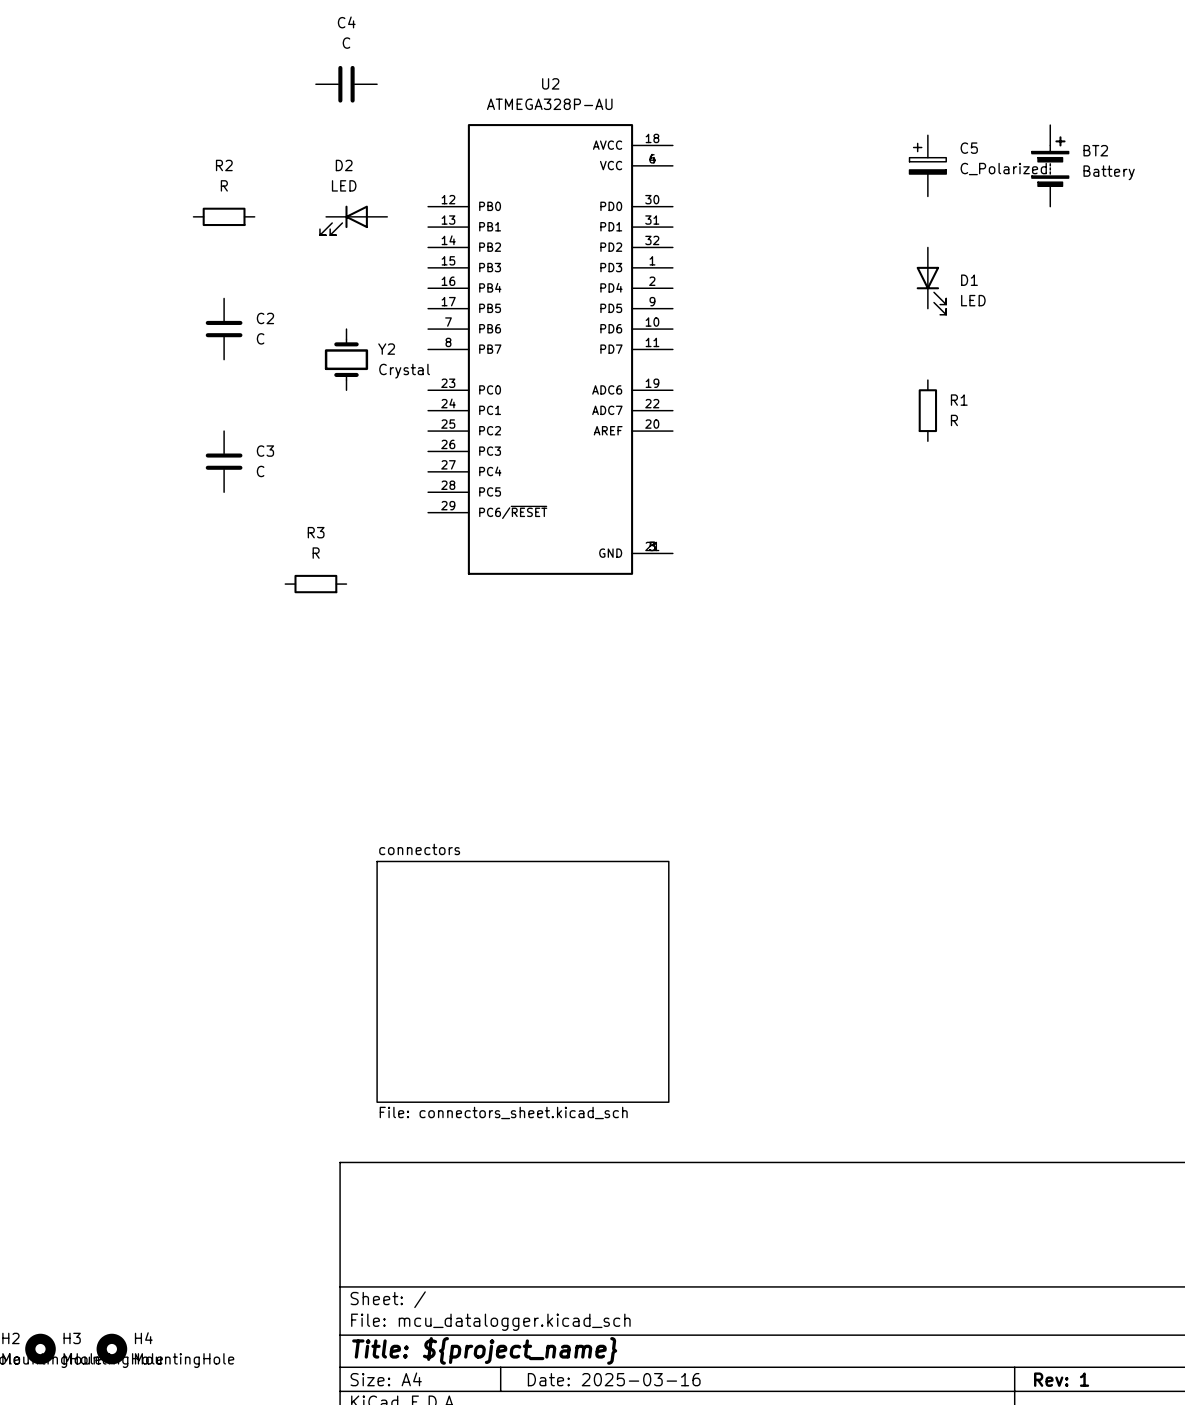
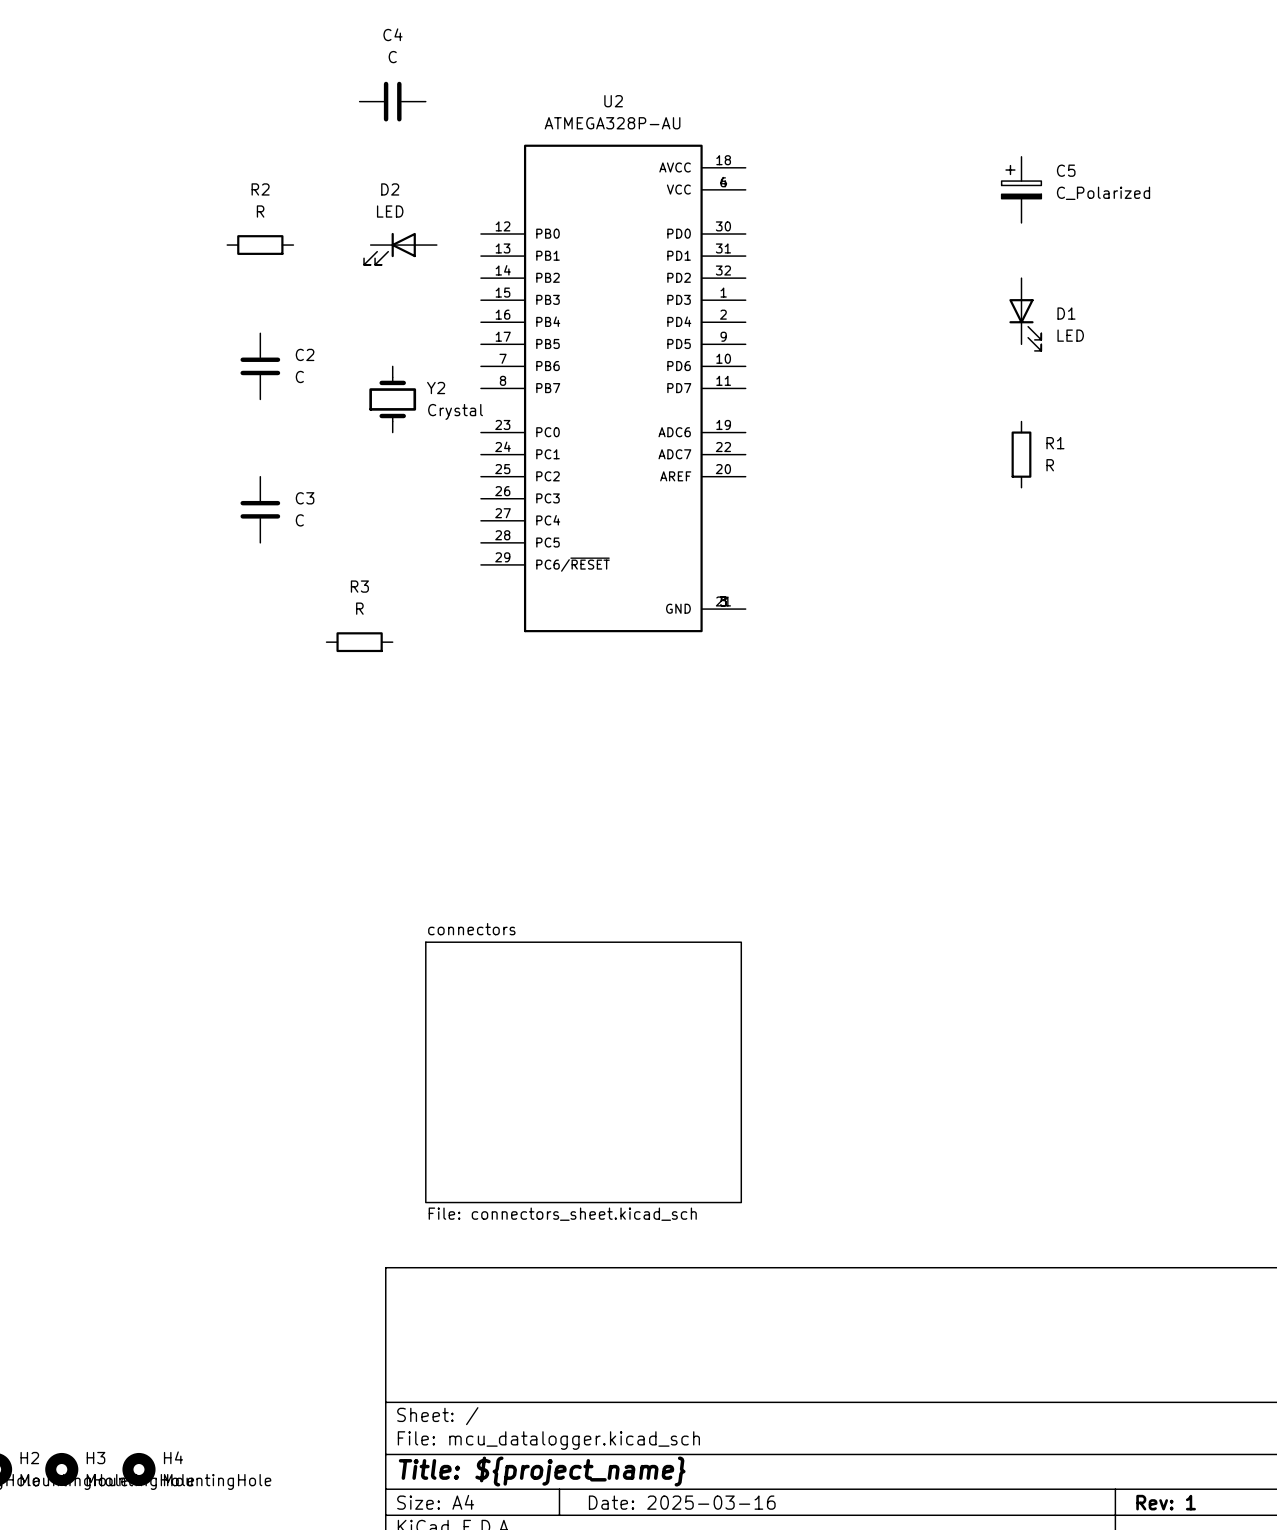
BT2: Battery (1050, 165) -> none

